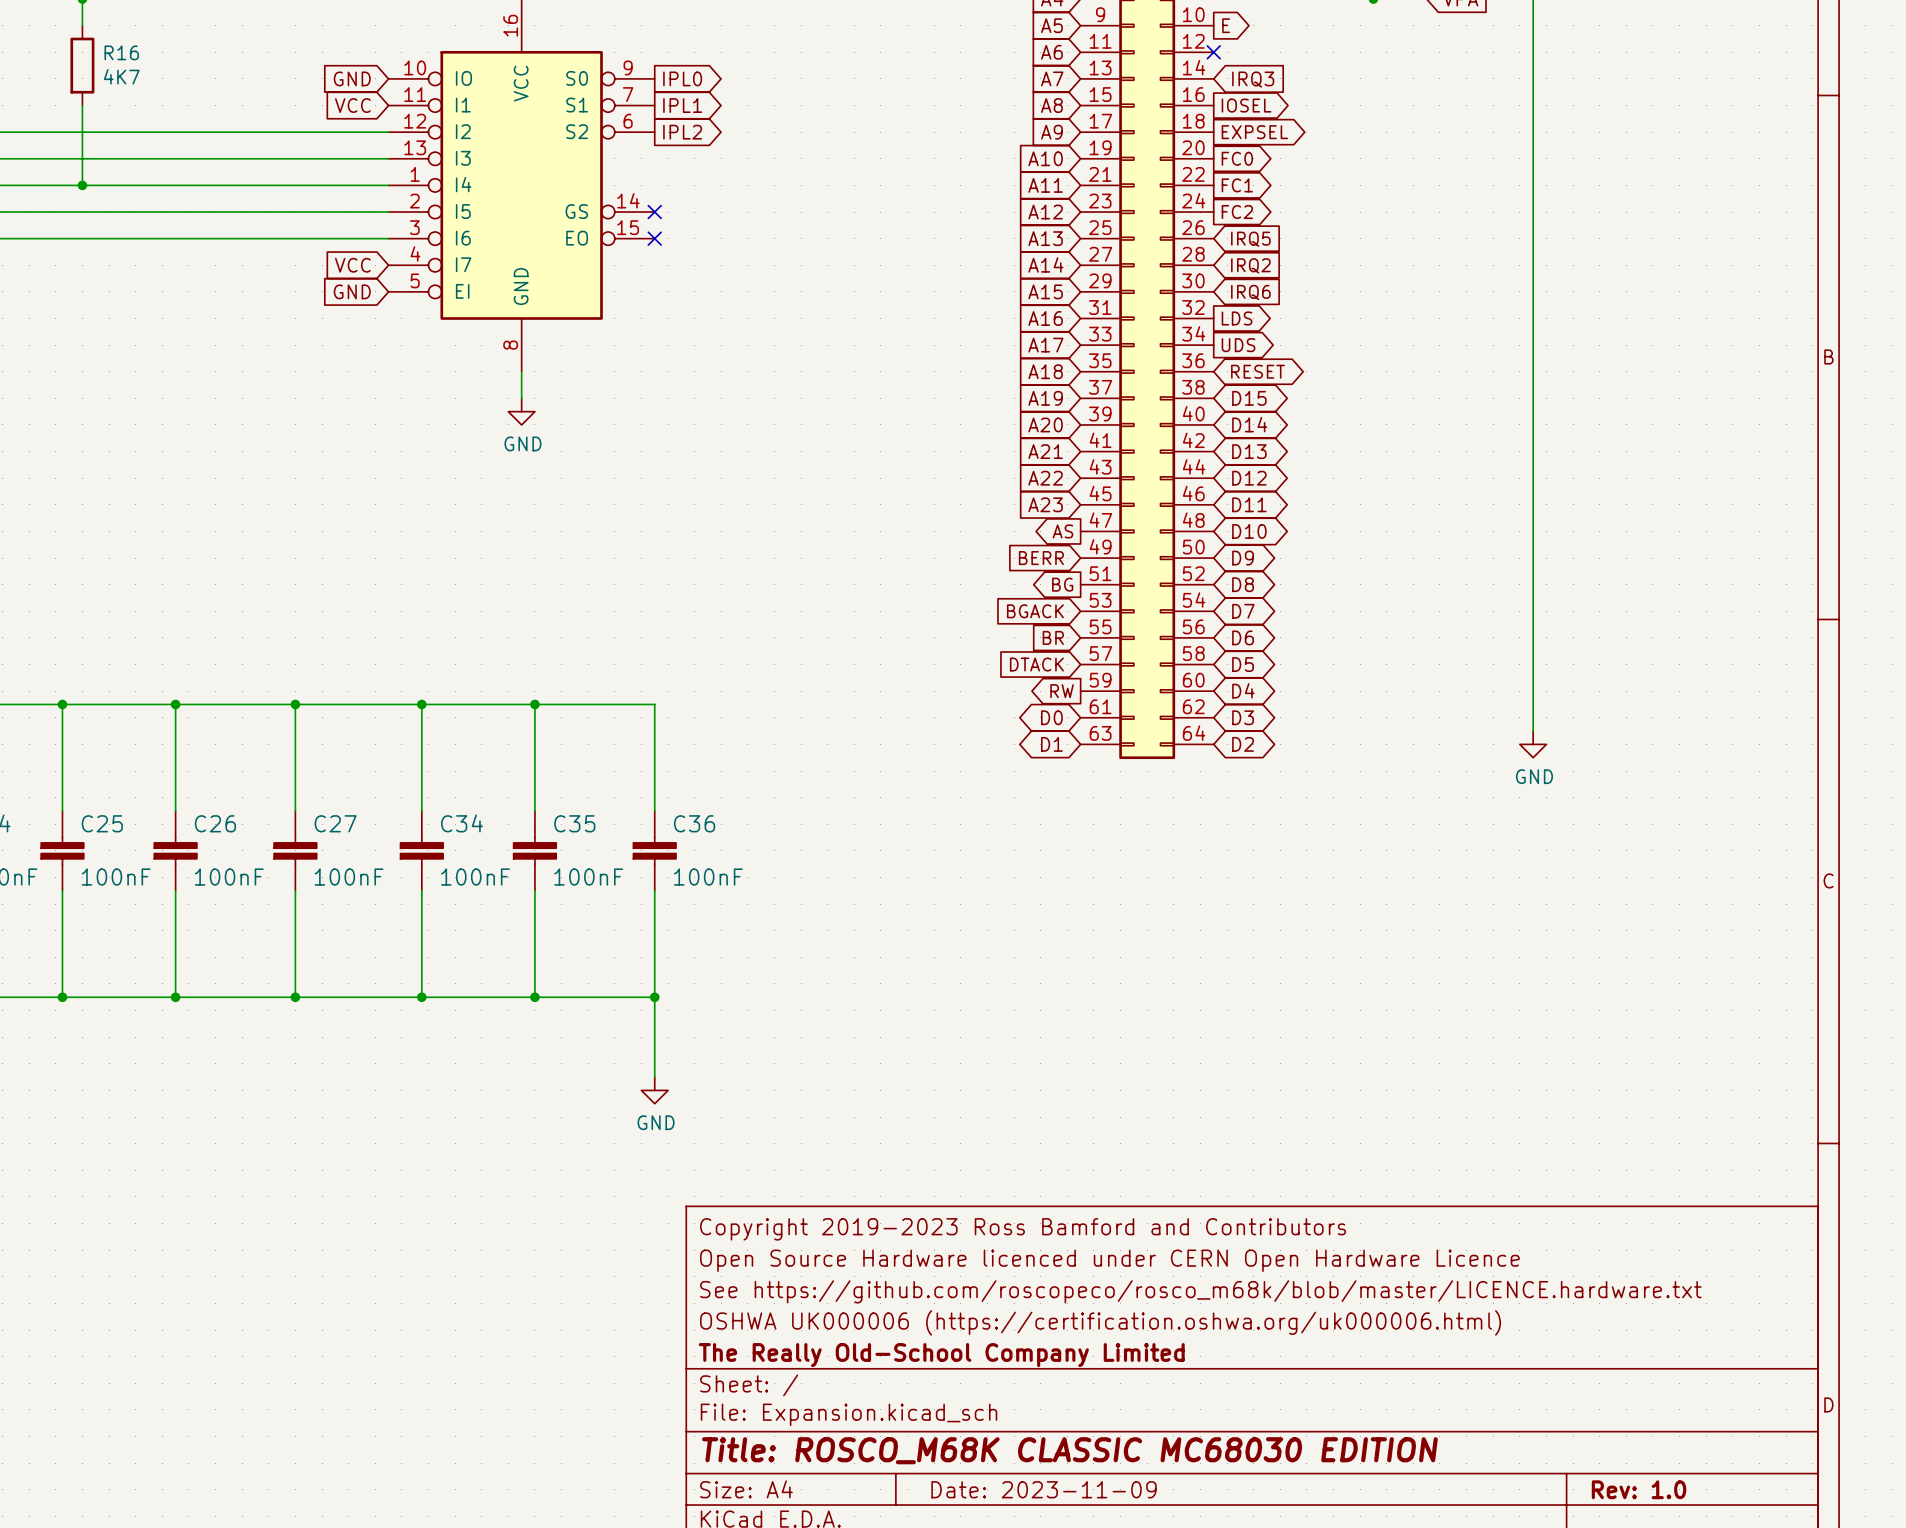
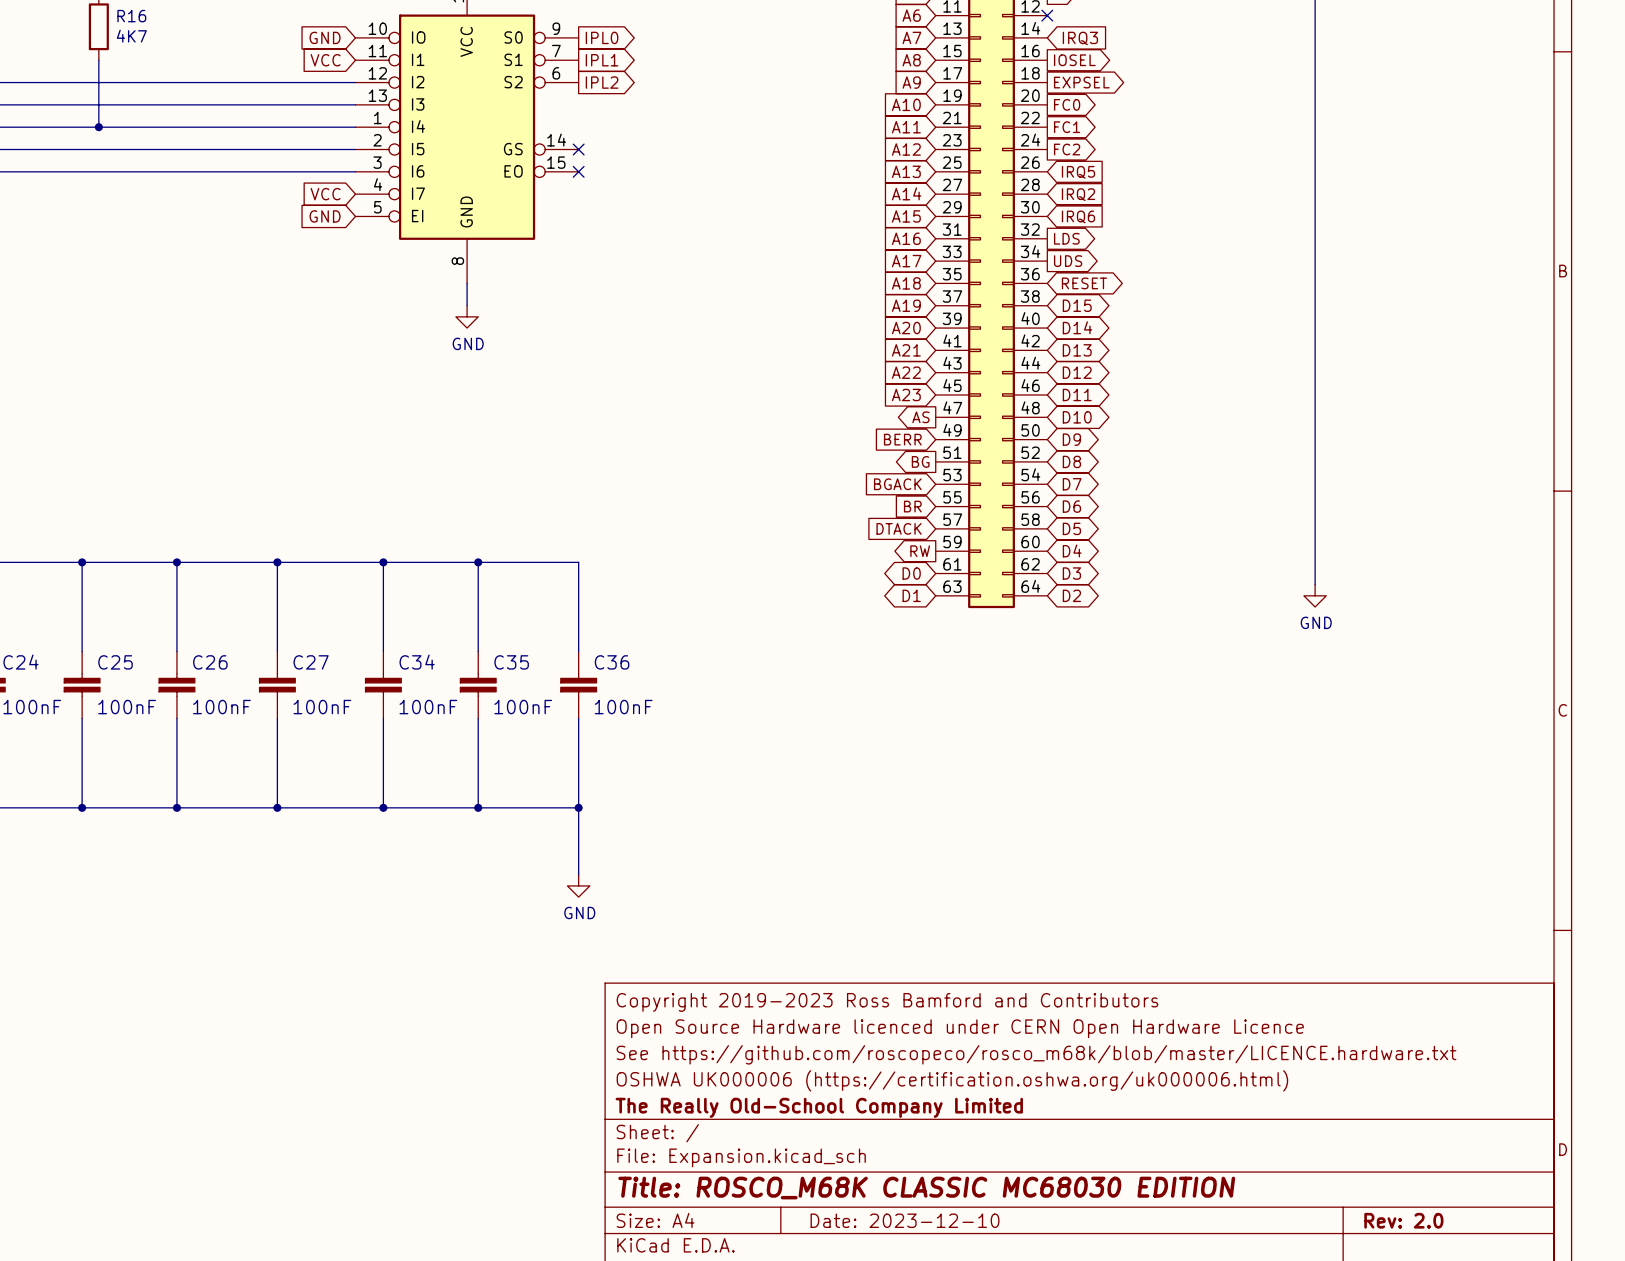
title block: Date: 2023-11-09 (1044, 1489) -> Date: 2023-12-10 (905, 1220)
title block: Rev: 1.0 (1639, 1489) -> Rev: 2.0 (1403, 1220)

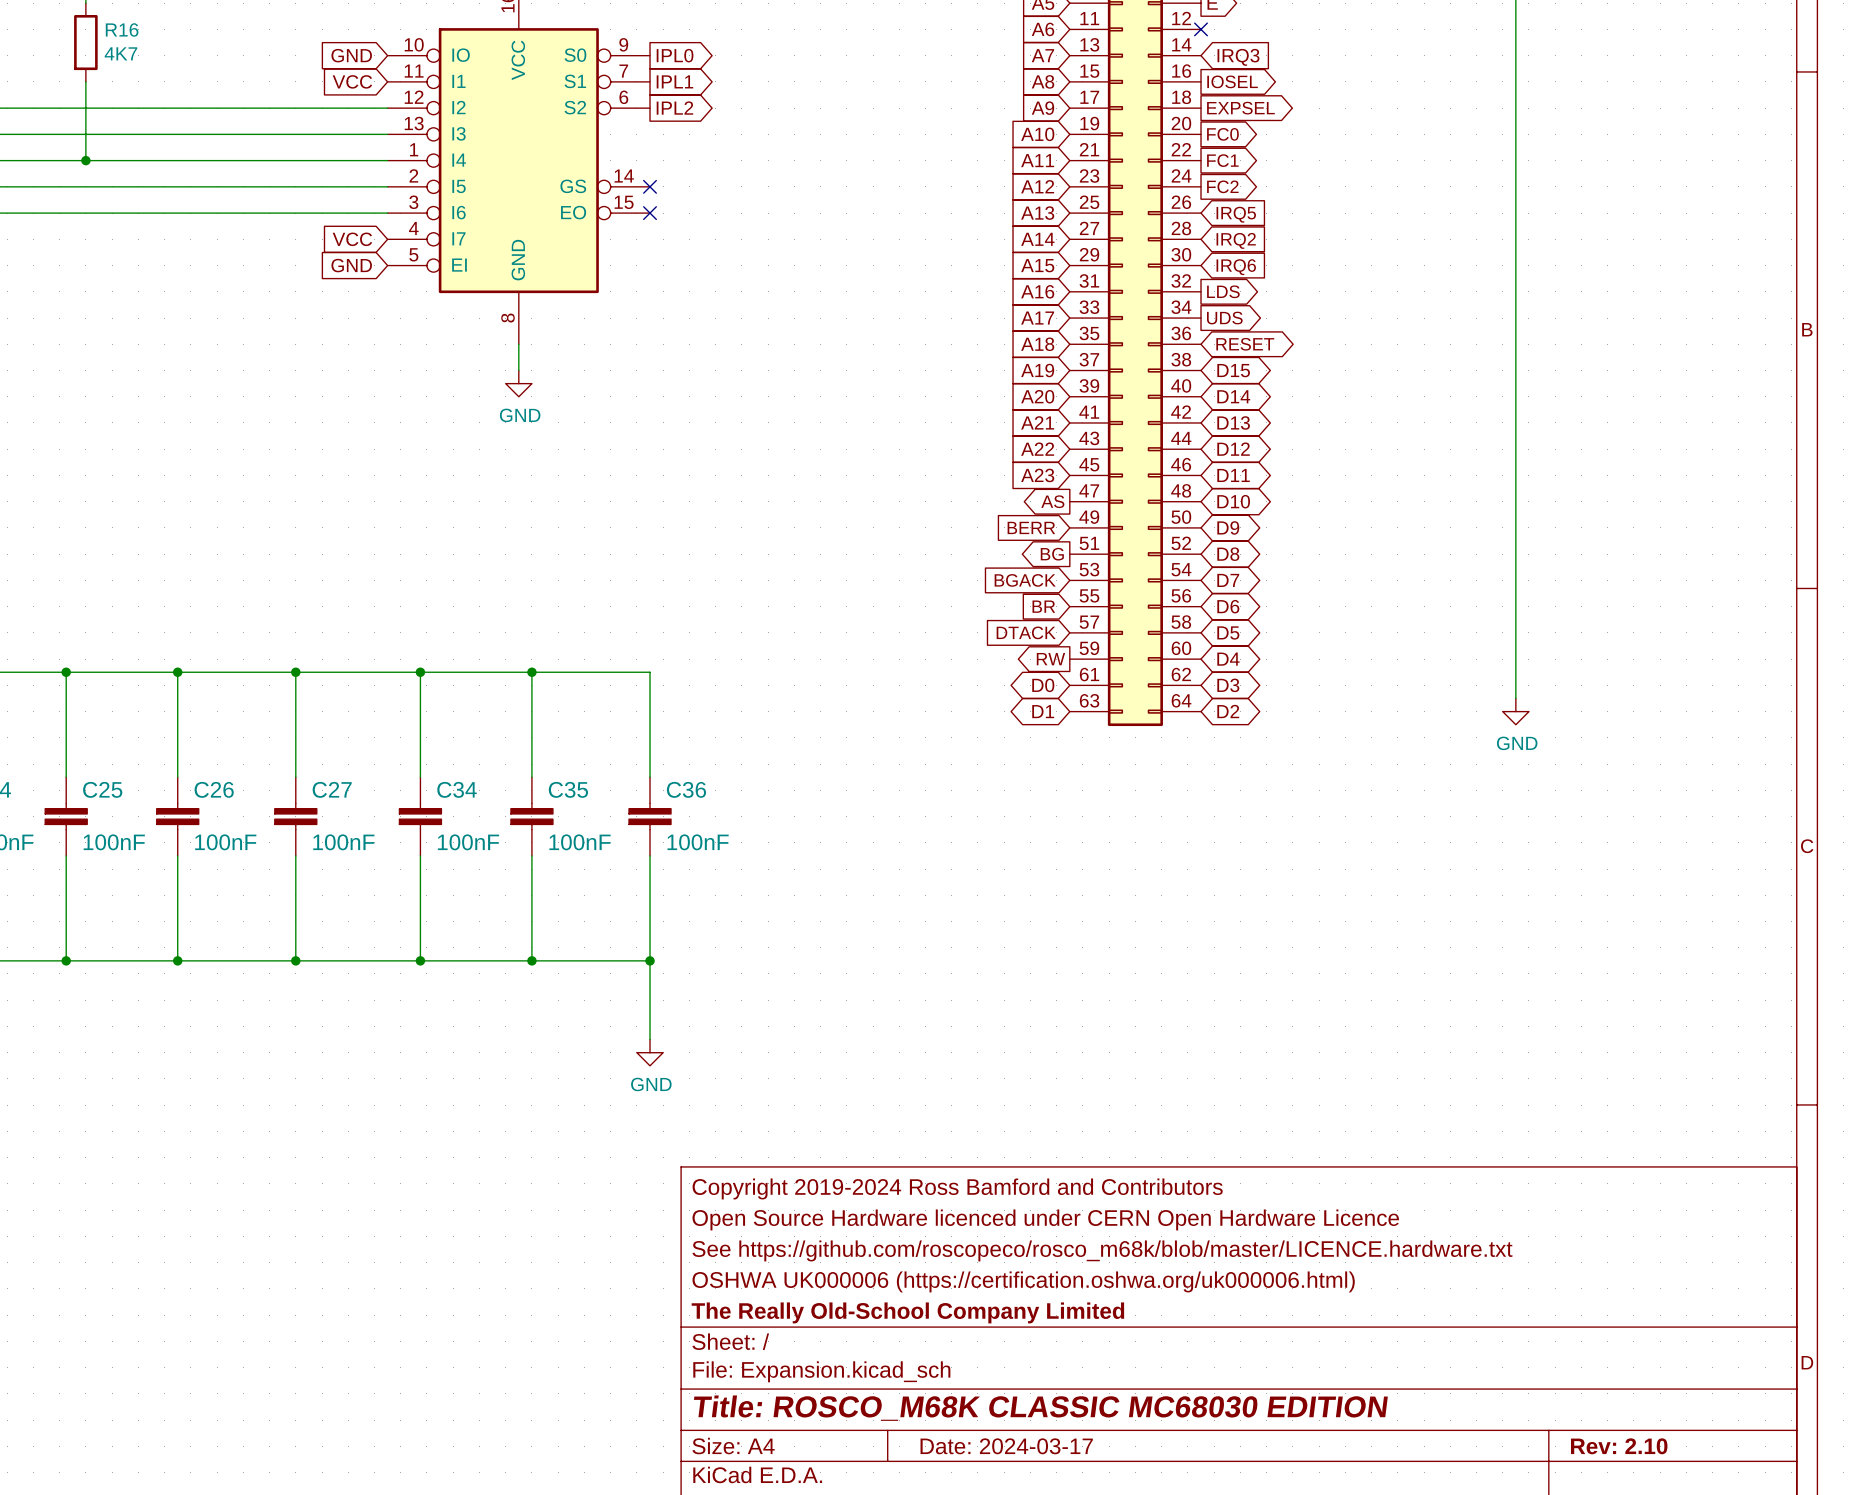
title block: Copyright 2019-2023 Ross Bamford and Contributors (887, 1002) -> Copyright 2019-2024 Ross Bamford and Contributors (957, 1188)
title block: Date: 2023-12-10 (905, 1220) -> Date: 2024-03-17 (1006, 1446)
title block: Rev: 2.0 (1403, 1220) -> Rev: 2.10 (1619, 1446)

